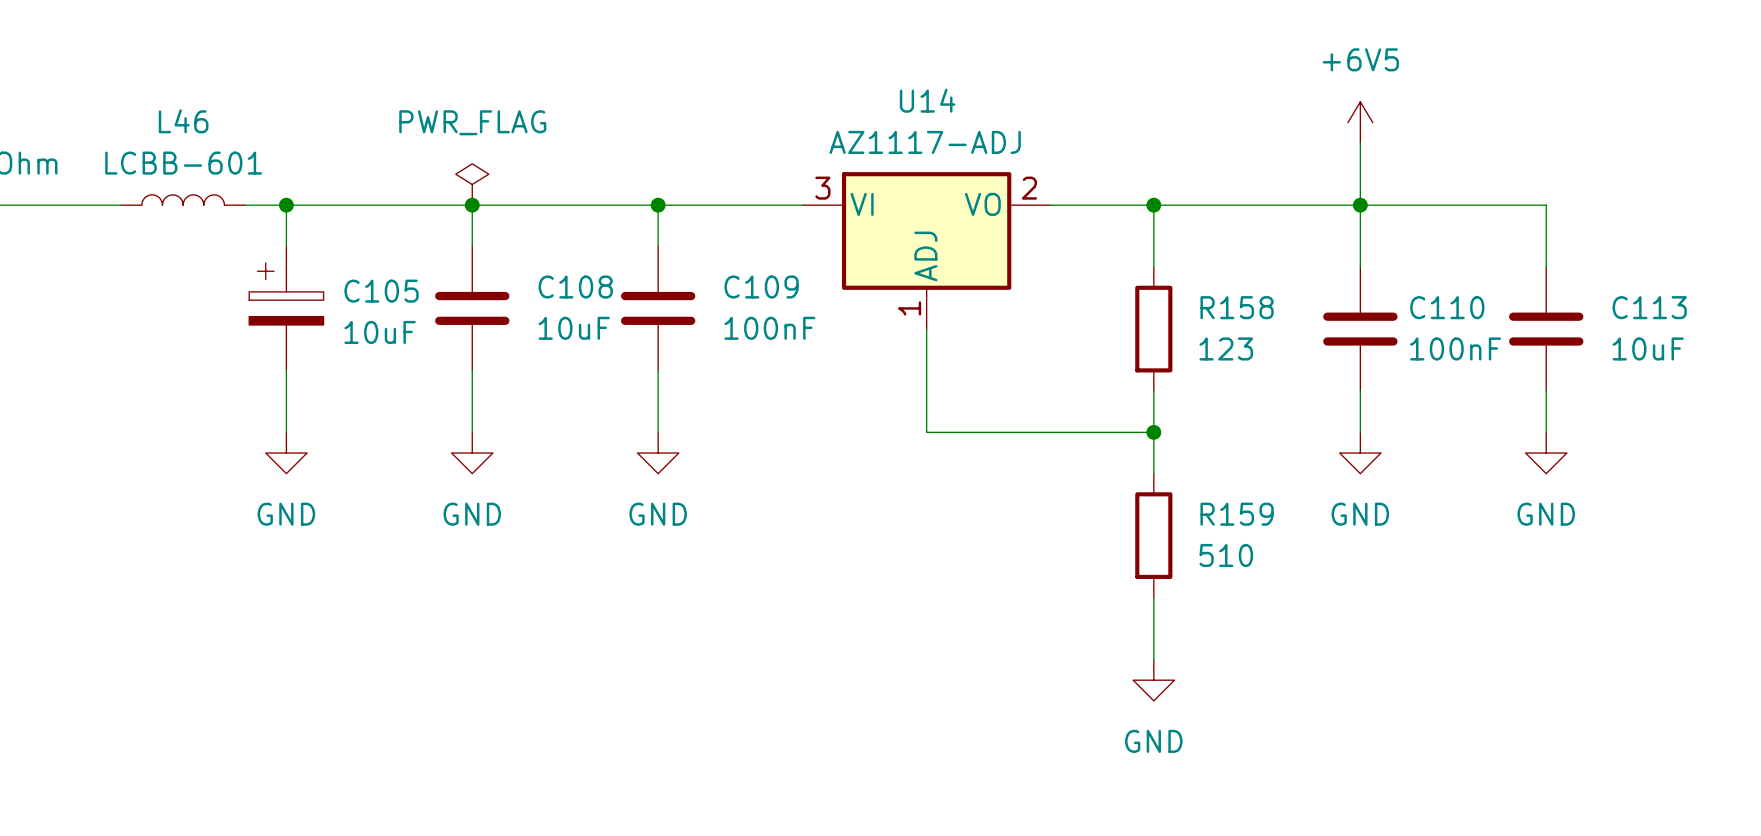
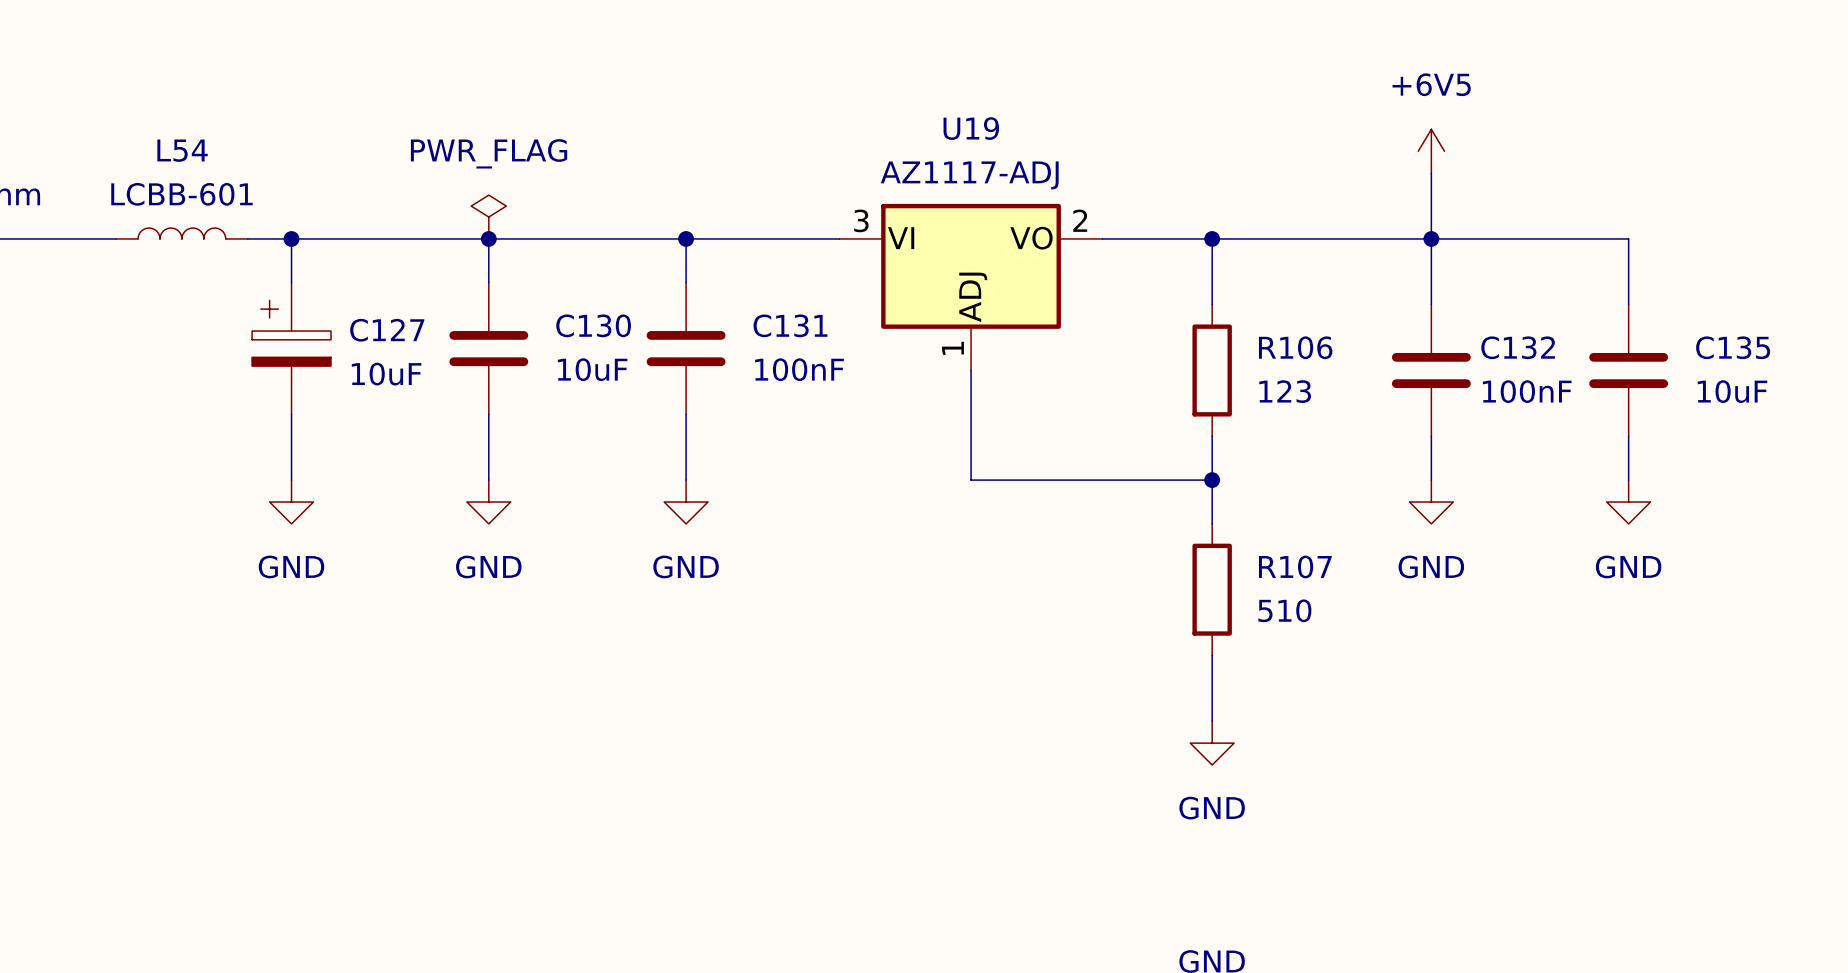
U14 name: U14 (927, 100) -> U19 (971, 128)
L46 name: L46 (183, 121) -> L54 (182, 150)
C108 name: C108 (575, 287) -> C130 (593, 325)
C109 name: C109 (761, 287) -> C131 (790, 325)
C105 name: C105 (381, 291) -> C127 (387, 330)
R158 name: R158 (1237, 307) -> R106 (1295, 347)
C110 name: C110 (1447, 307) -> C132 (1518, 347)
C113 name: C113 (1649, 307) -> C135 (1733, 347)
R159 name: R159 (1237, 514) -> R107 (1295, 566)

